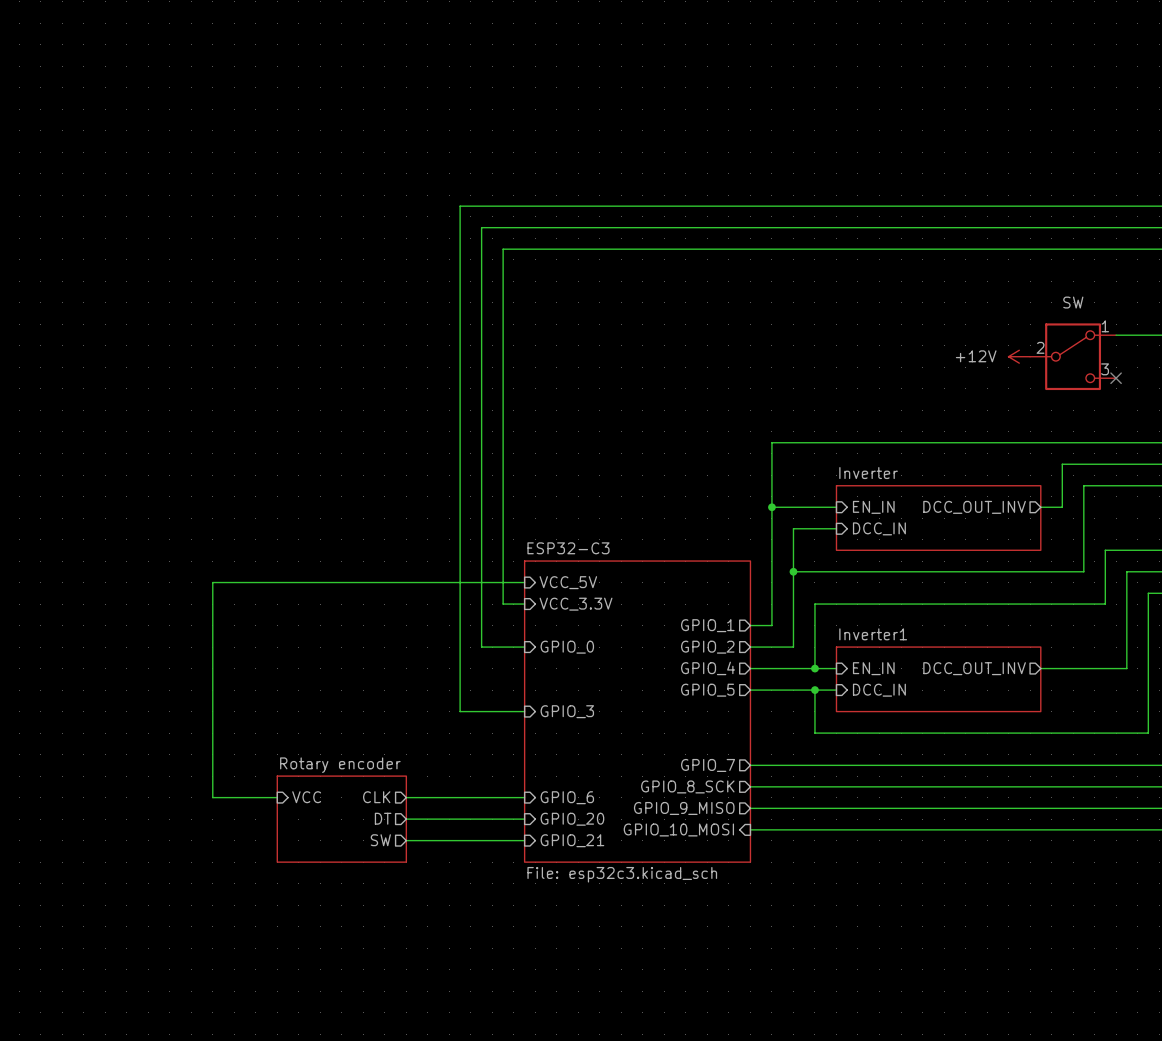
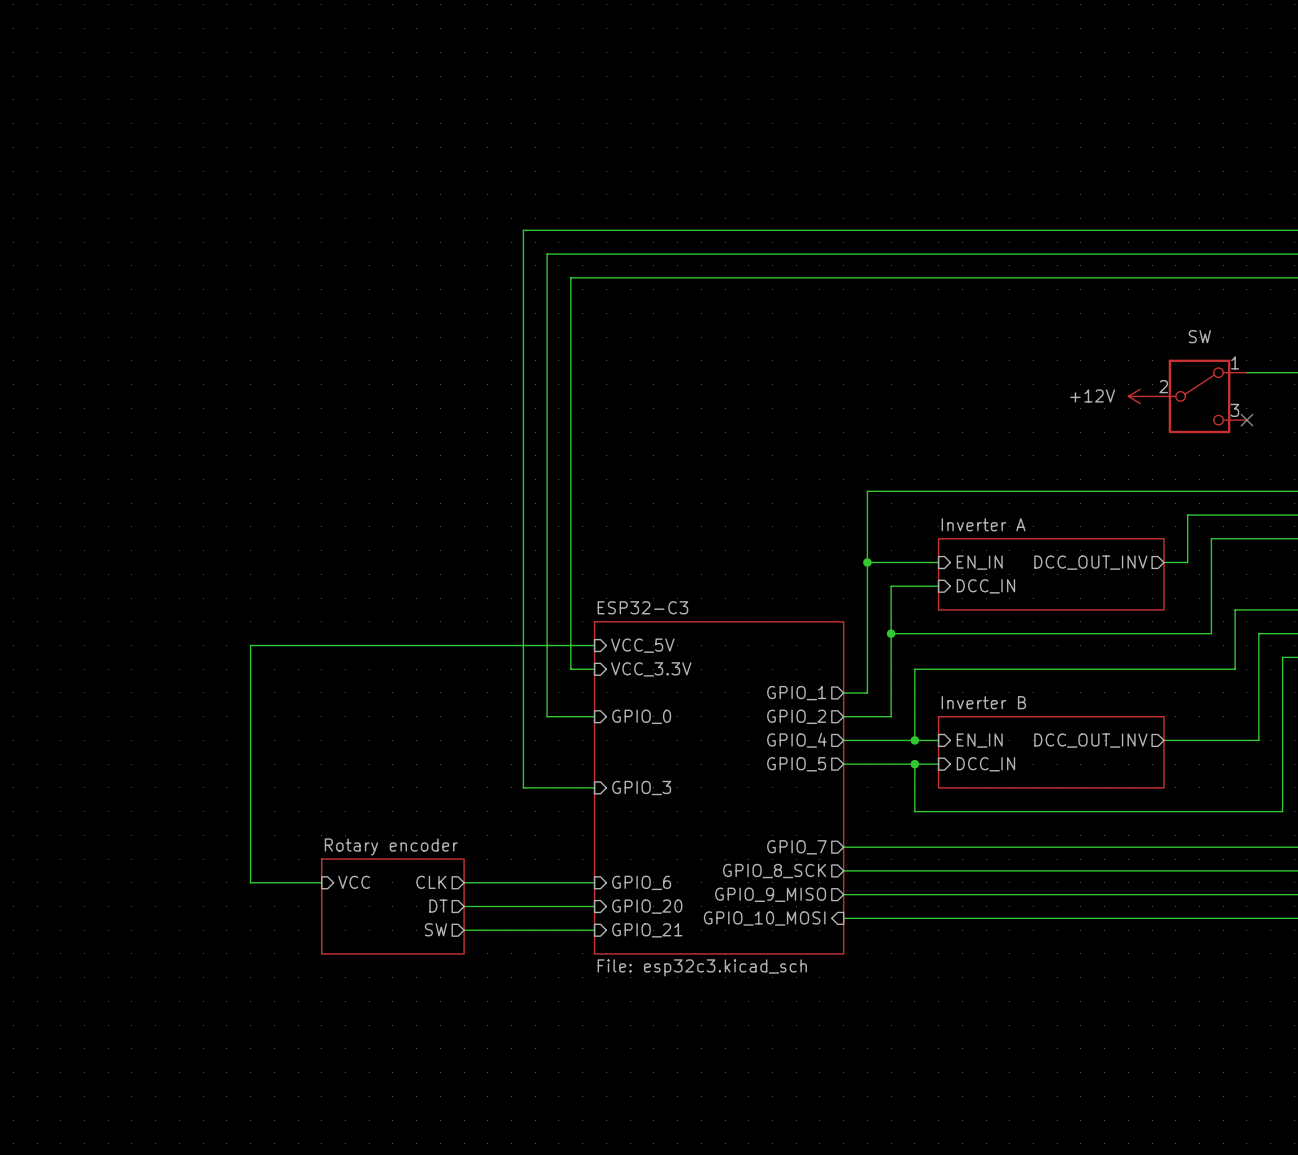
sheet Inverter name: Inverter (868, 473) -> Inverter A (983, 524)
sheet Inverter1 name: Inverter1 (873, 634) -> Inverter B (983, 702)

